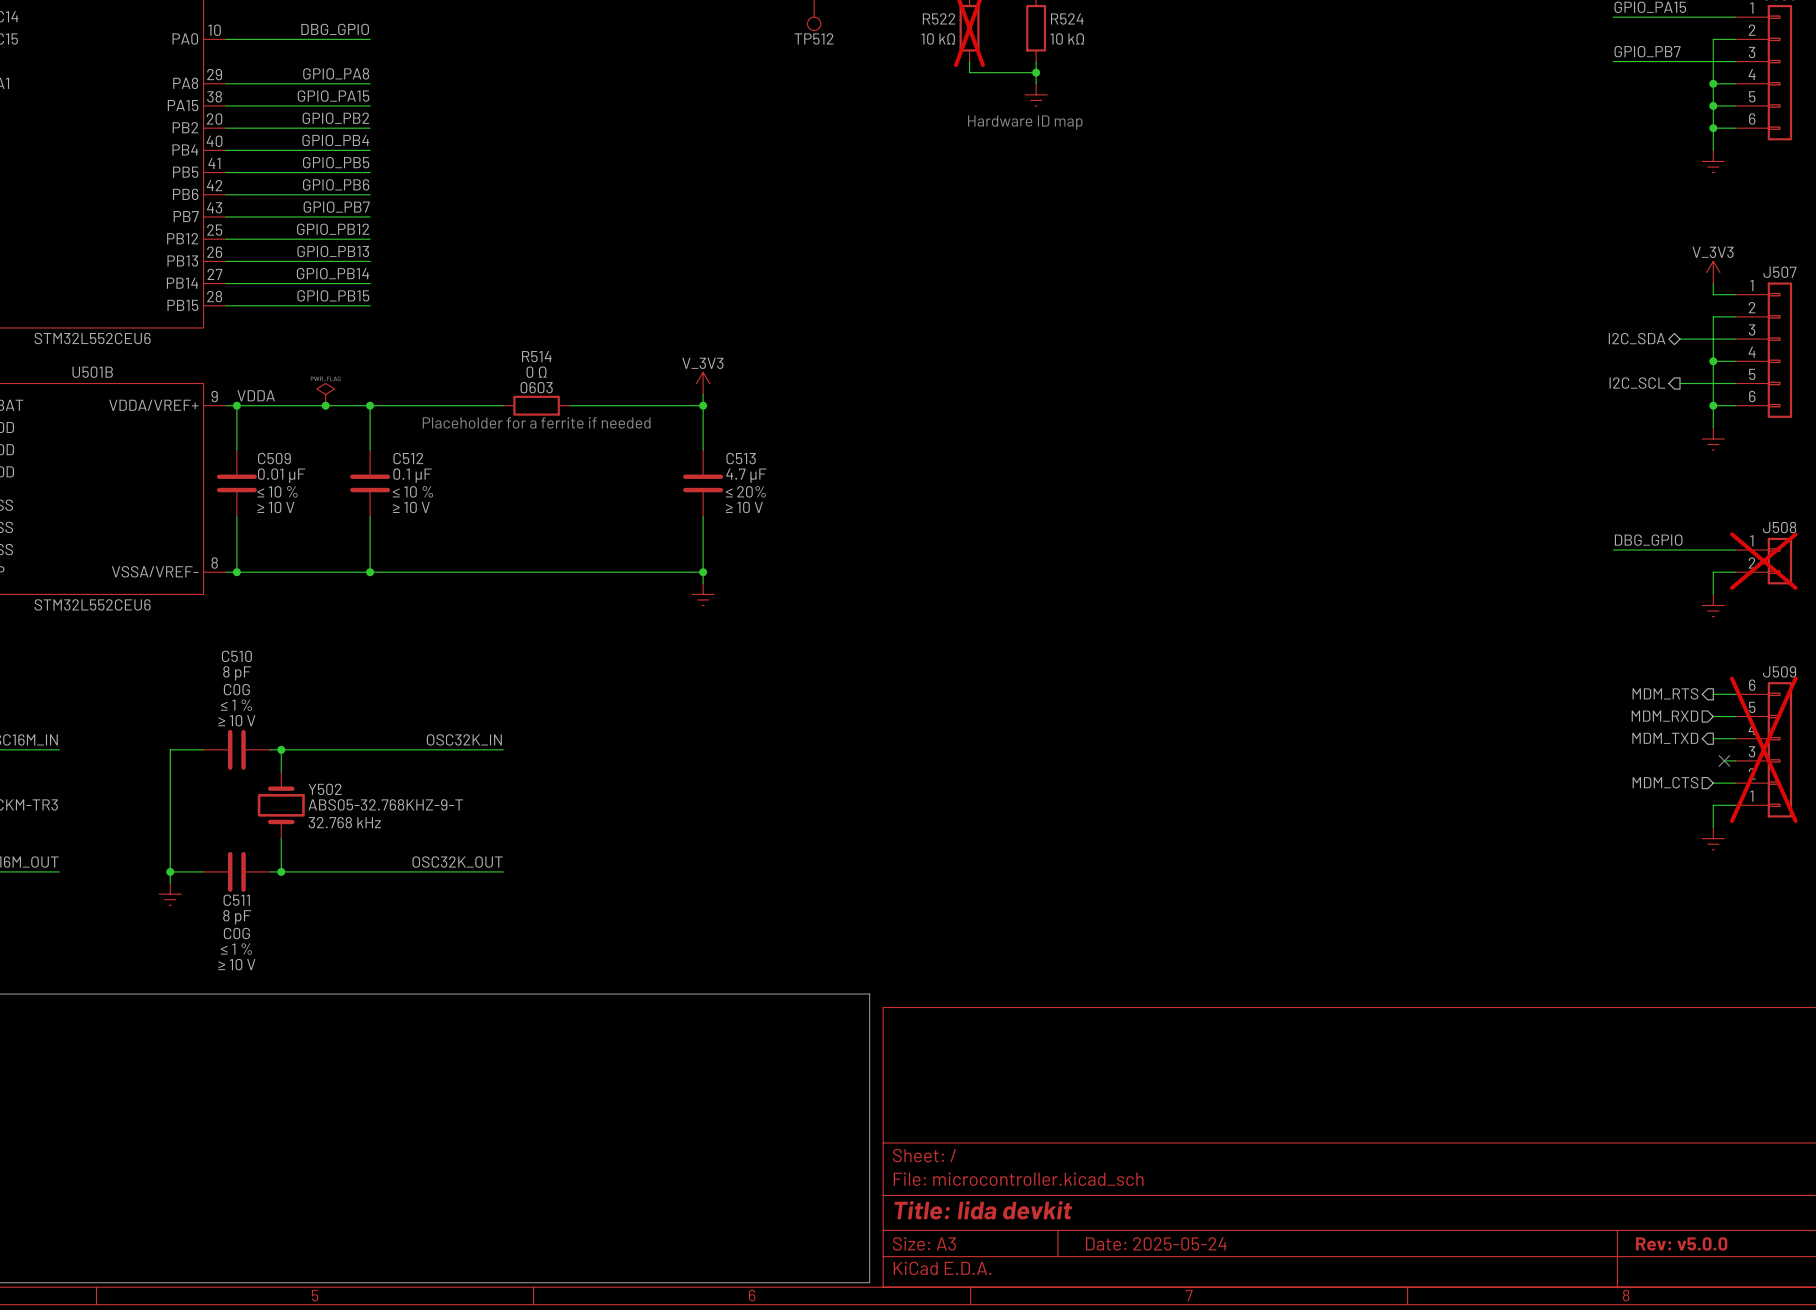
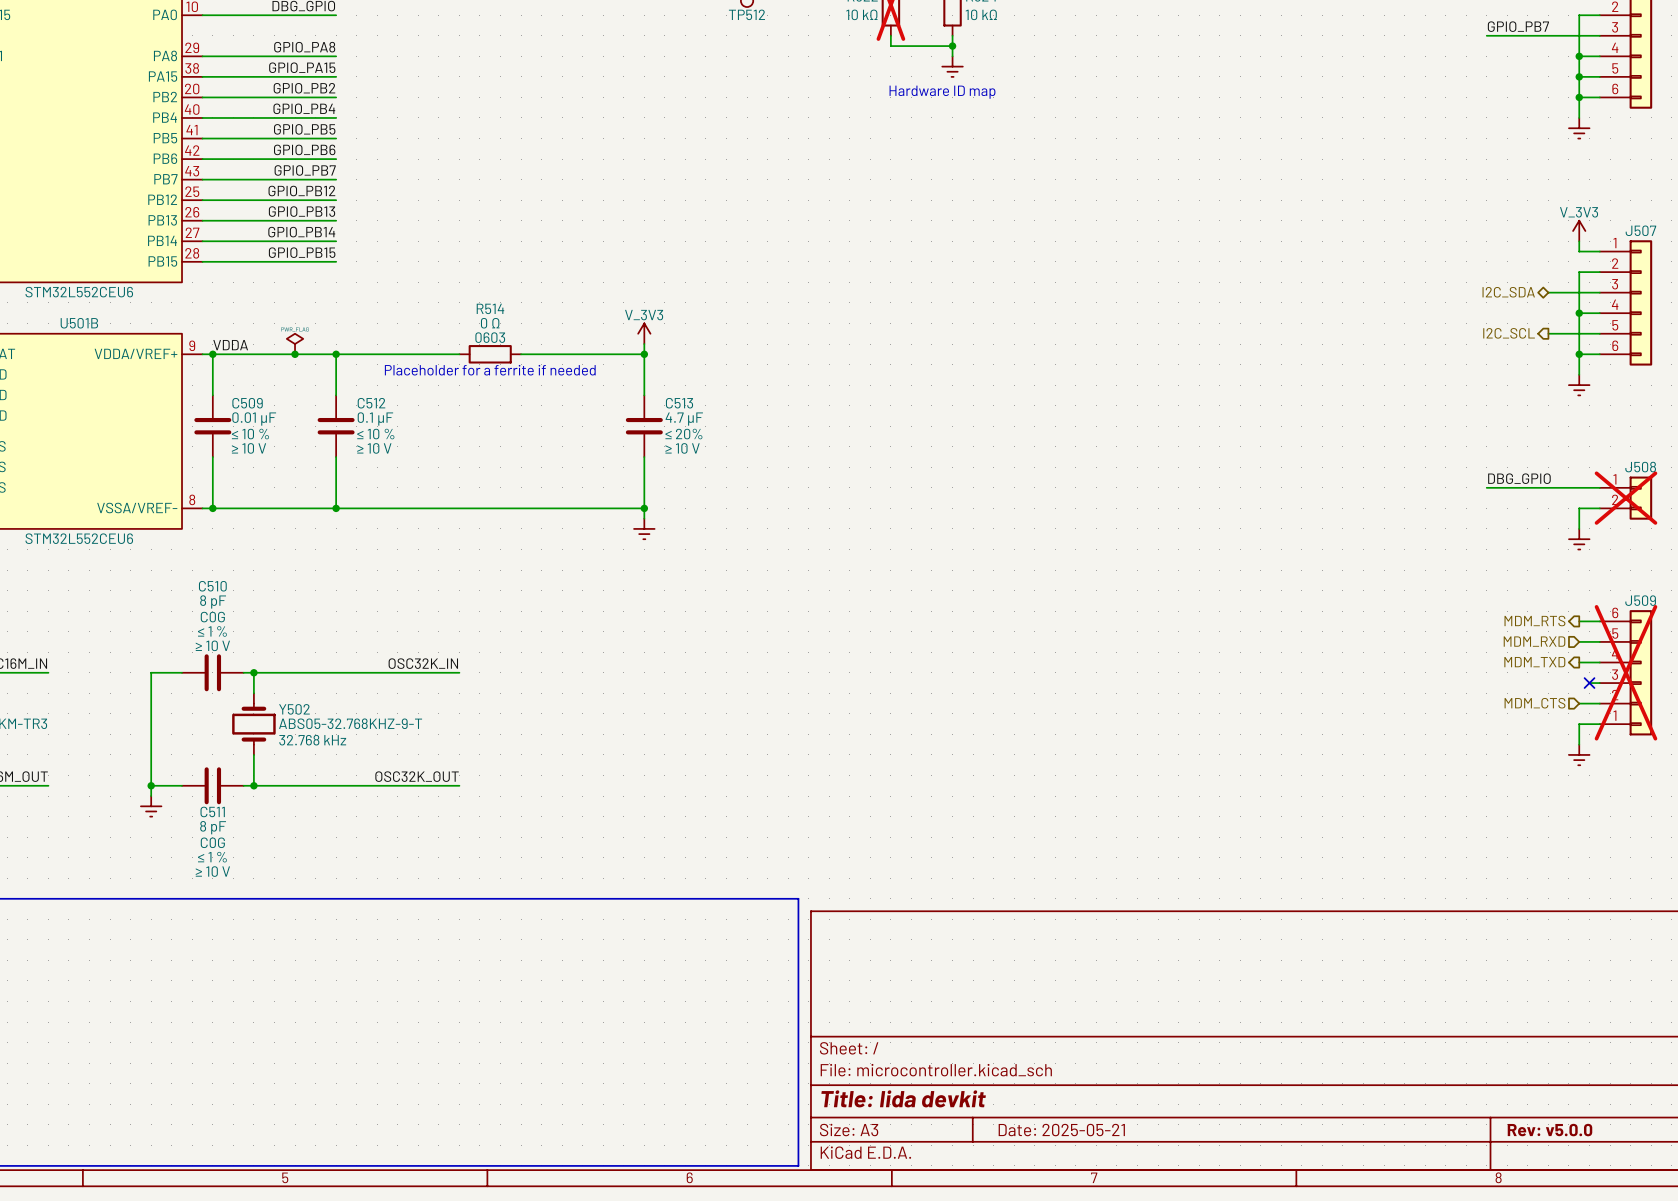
title block: Date: 2025-05-24 (1156, 1243) -> Date: 2025-05-21 (1061, 1130)

